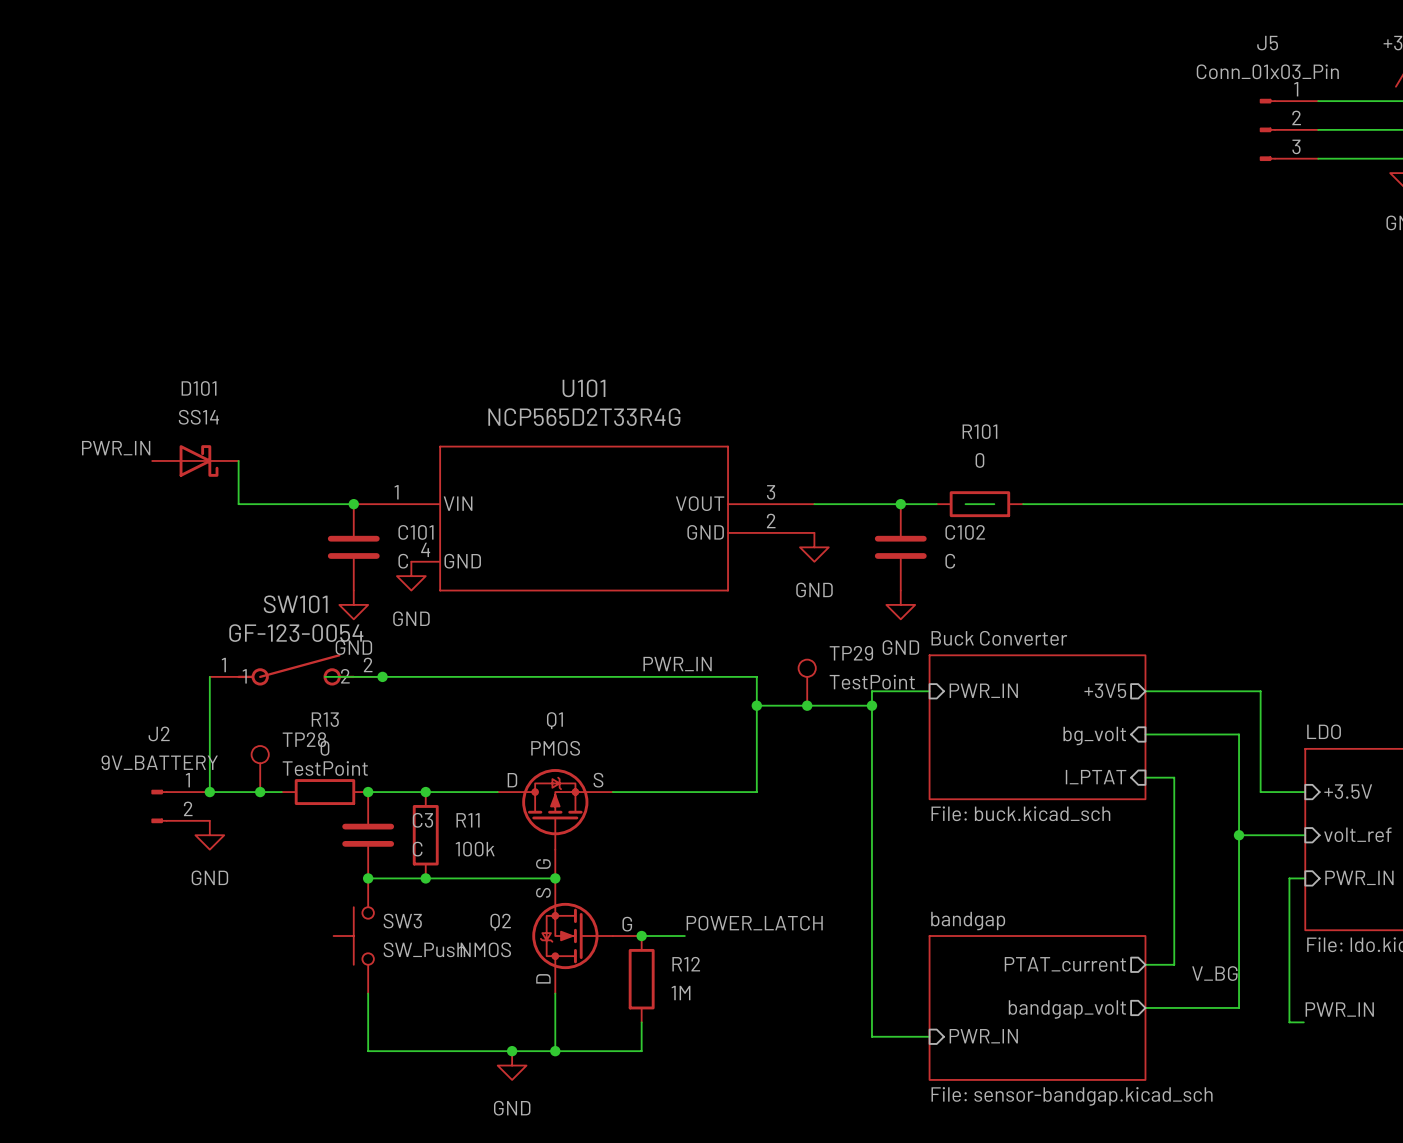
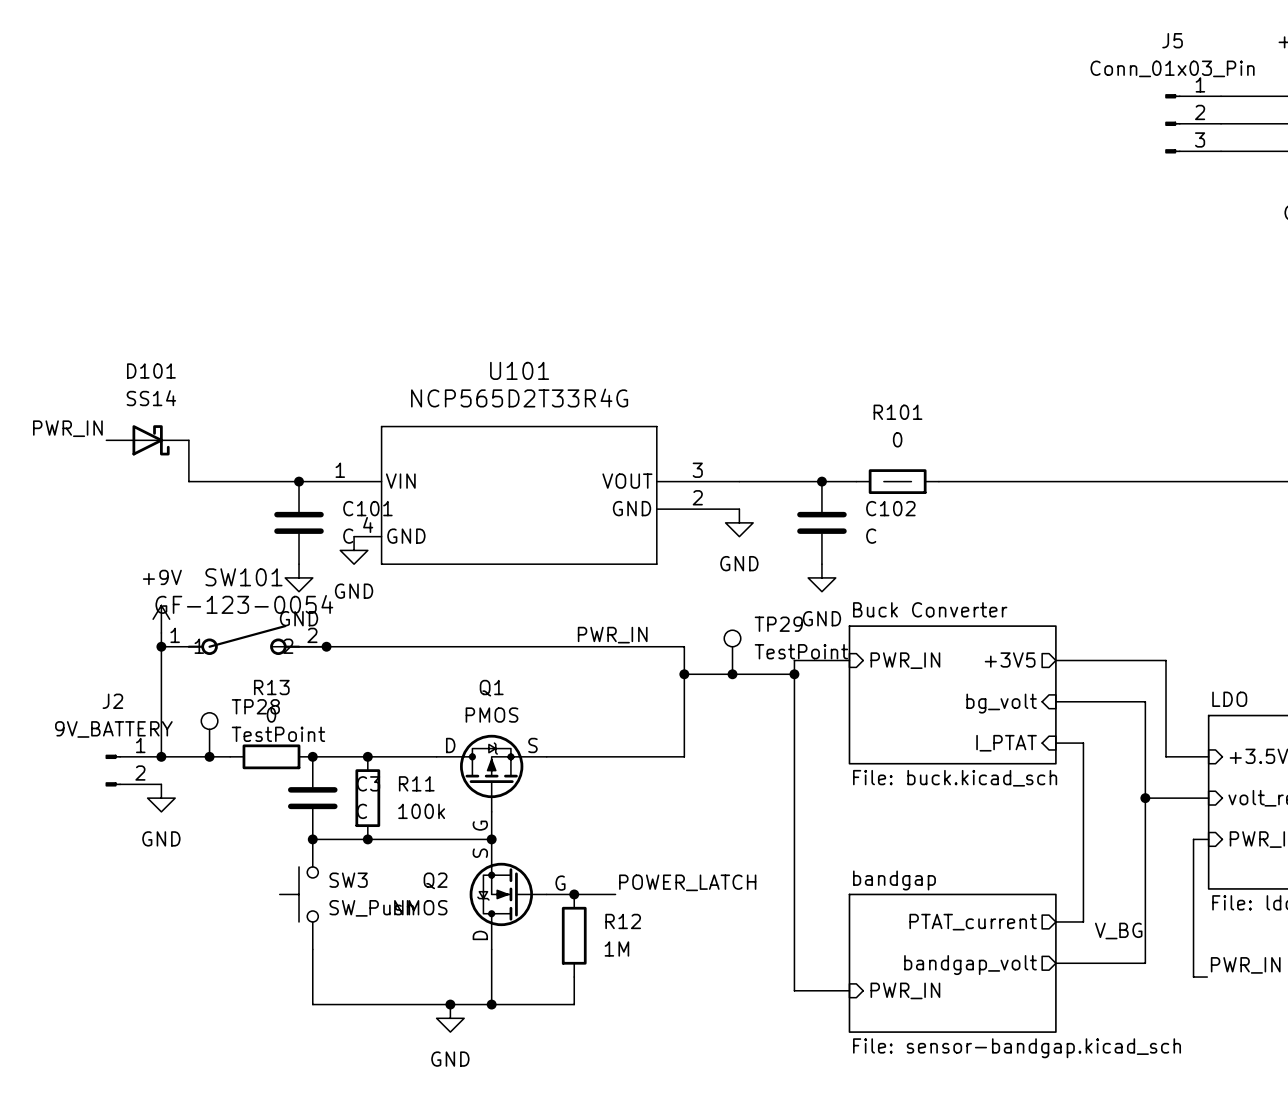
power symbol: none -> +9V (161, 619)
wire: none -> (161, 632) (161, 646)
junction: none -> (161, 646)

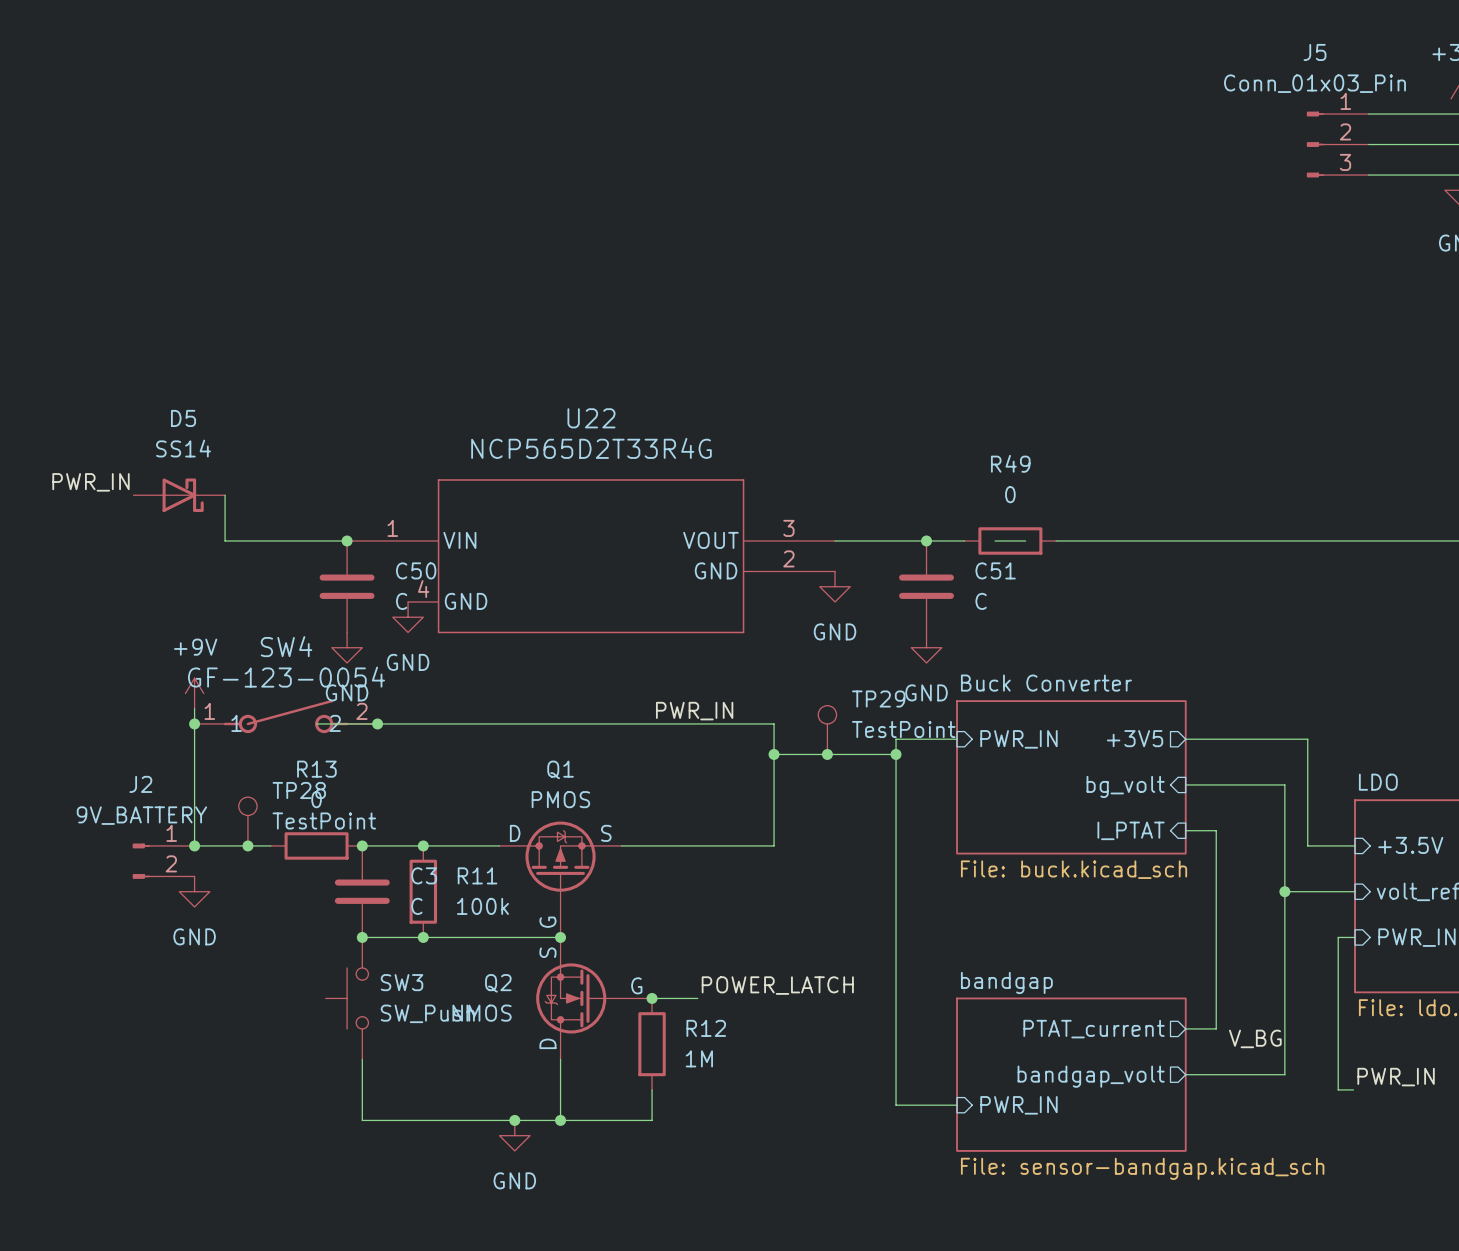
D101 name: D101 (151, 370) -> D5 (183, 418)
U101 name: U101 (519, 370) -> U22 (591, 418)
R101 name: R101 (897, 412) -> R49 (1010, 463)
C101 name: C101 (367, 508) -> C50 (416, 570)
C102 name: C102 (890, 508) -> C51 (995, 570)
SW101 name: SW101 (243, 577) -> SW4 (286, 646)

